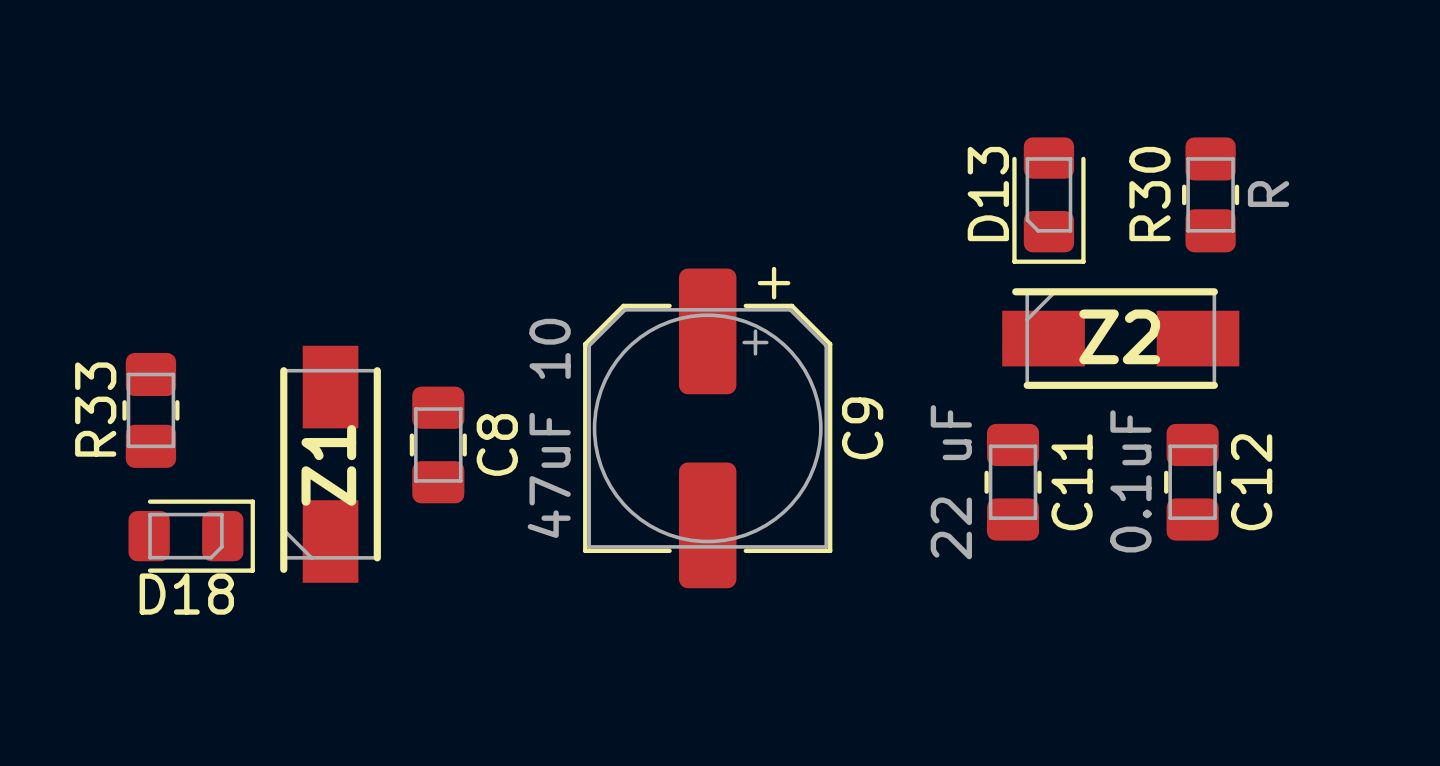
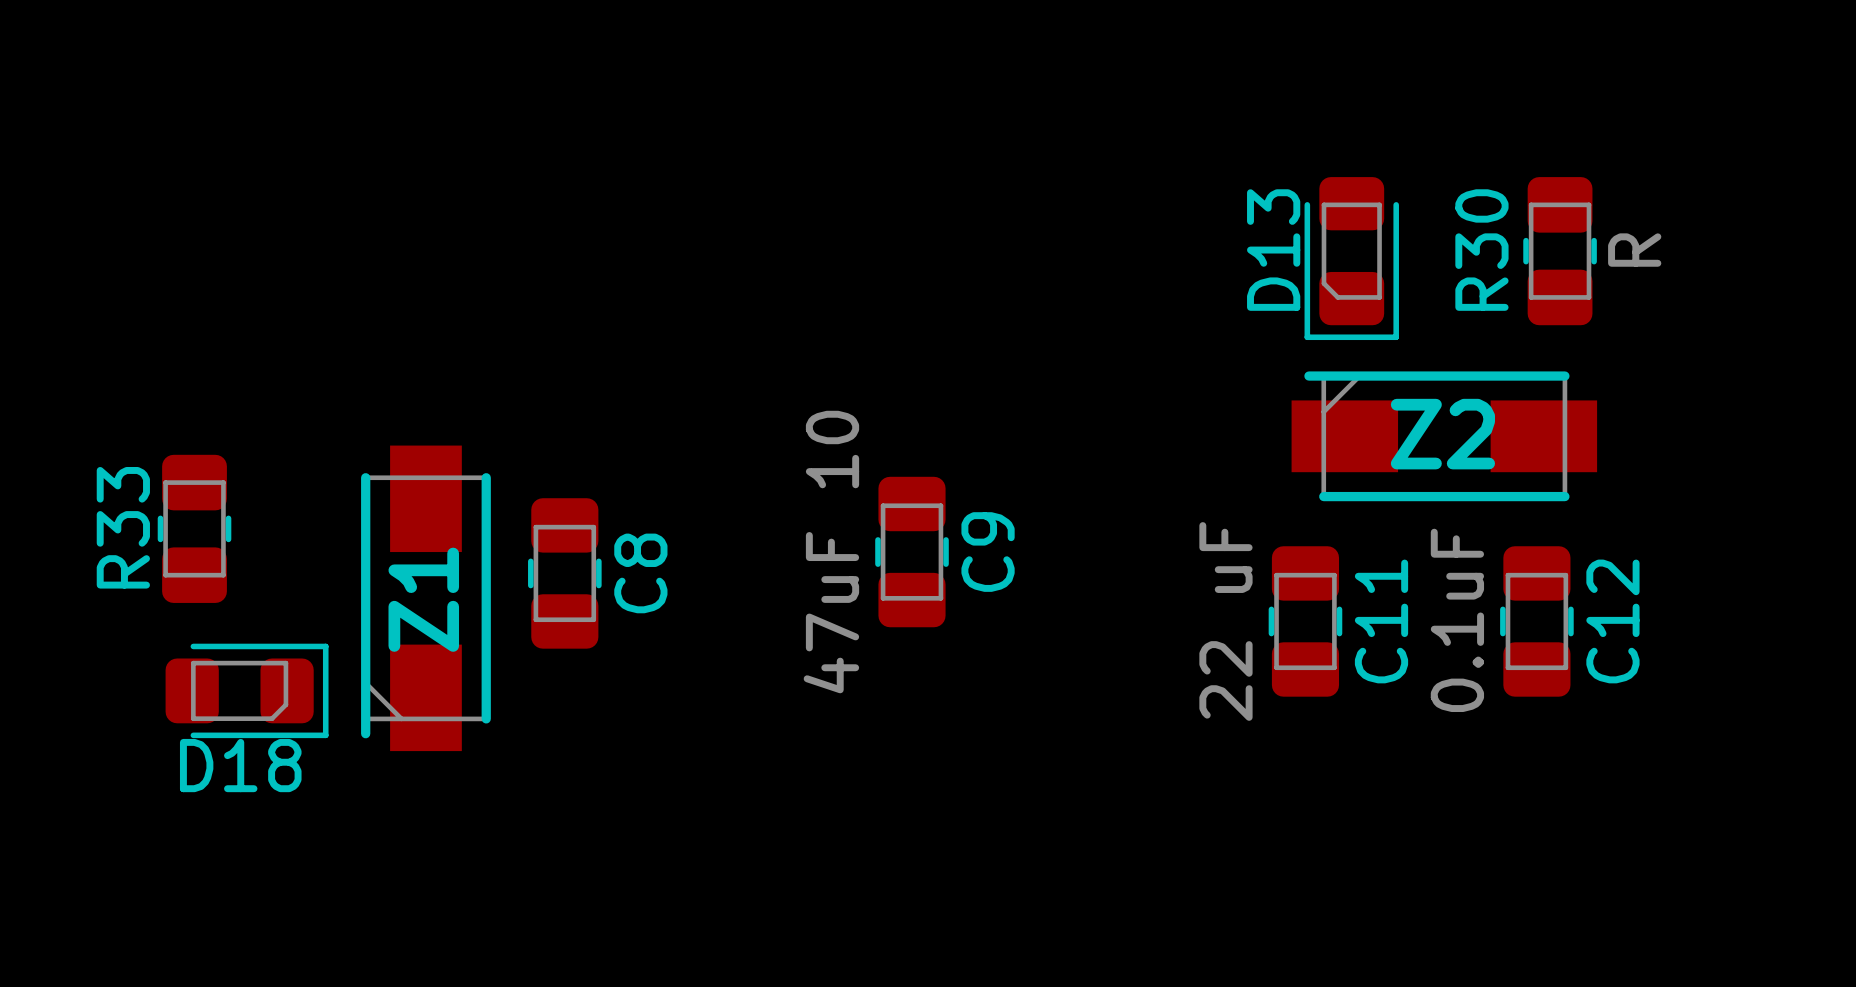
C9 footprint: [583, 266, 833, 589] -> [875, 476, 949, 628]
C9 value position: 47uF 10 (549, 428) -> 47uF 10 (831, 552)
C9 name position: C9 (862, 428) -> C9 (988, 552)

